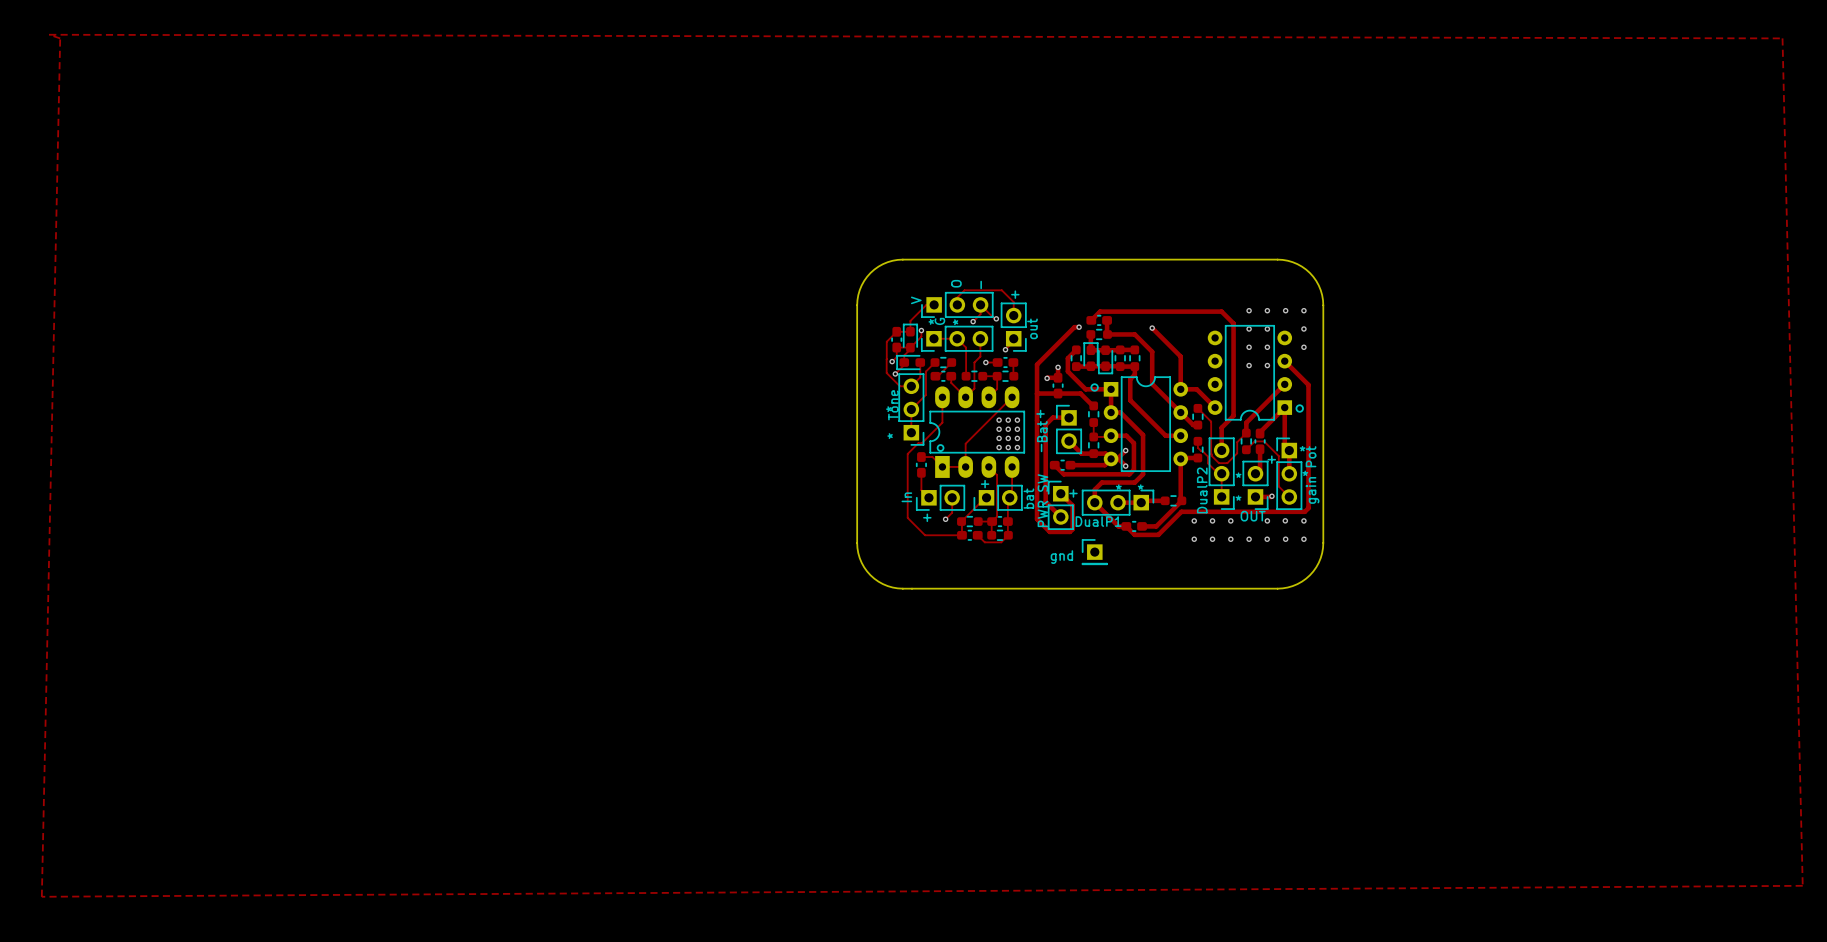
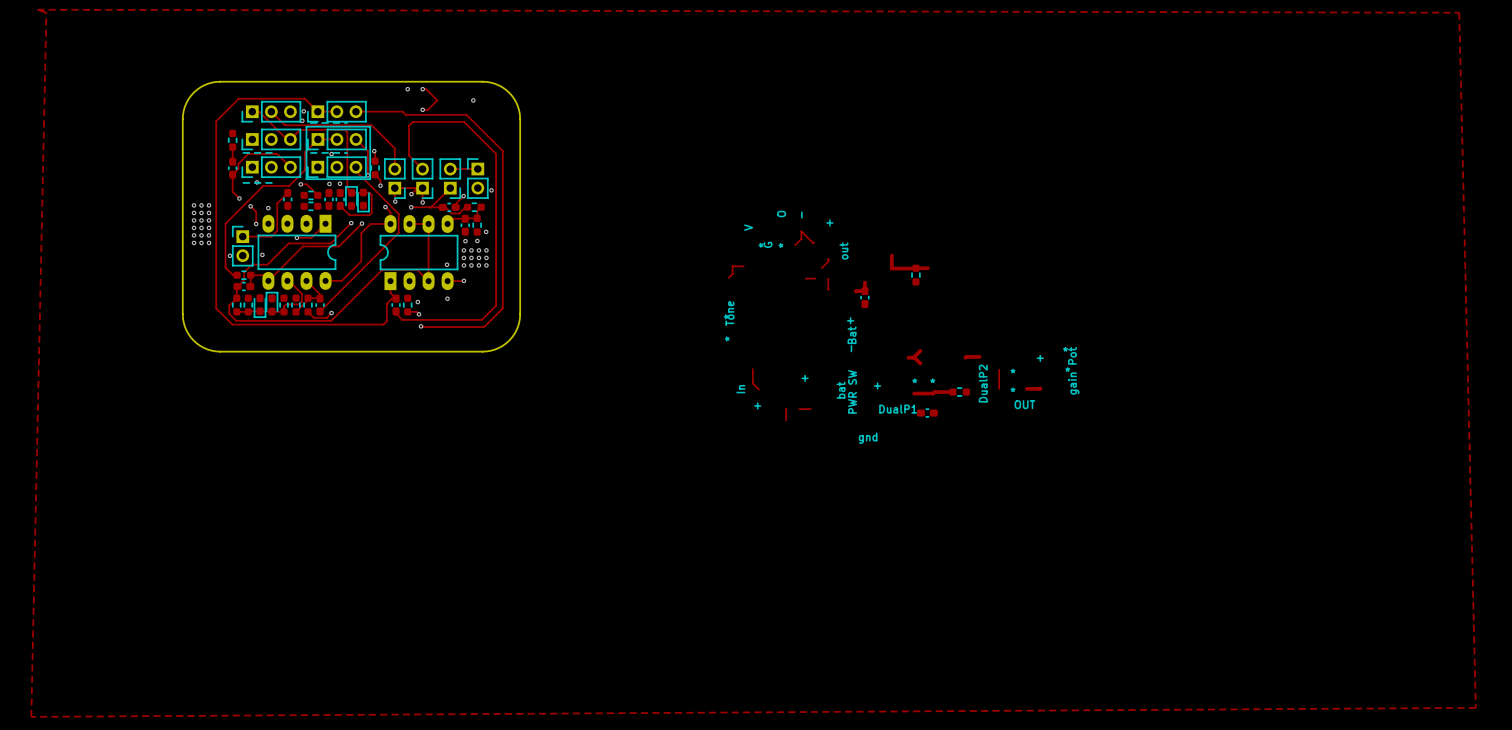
board edge: none -> (220, 81) (482, 81) (495, 83) (506, 89) (516, 102) (520, 119) (520, 314) (518, 326) (512, 337) (498, 347) (482, 351) (220, 351) (207, 349) (196, 343) (188, 334) (183, 318) (183, 115) (186, 102) (193, 92) (204, 85) (220, 81)
via: none -> (407, 89)
track: none -> (422, 89) (426, 89) (437, 100) (428, 109) (422, 109)
via: none -> (422, 89)
via: none -> (473, 100)
via: none -> (422, 109)
via: none -> (303, 111)
track: none -> (252, 111) (259, 111) (286, 139) (290, 139) (300, 129) (345, 129) (347, 132) (347, 188) (351, 192) (369, 192) (371, 194) (371, 212) (369, 215) (349, 215) (340, 205)
track: none -> (271, 111) (284, 125) (371, 125) (394, 148) (394, 169)
part: none -> (271, 111)
track: none -> (336, 111) (317, 111) (304, 98) (238, 98) (216, 121) (216, 308) (232, 324) (383, 324) (386, 321) (386, 303) (392, 298) (396, 298) (390, 292) (390, 281)
part: none -> (336, 111)
track: none -> (355, 111) (402, 111) (405, 114) (466, 114) (492, 140)
via: none -> (302, 120)
line: none -> (310, 122) (347, 122)
line: none -> (306, 126) (370, 126) (370, 179) (306, 179) (306, 126)
part: none -> (271, 139)
track: none -> (337, 139) (317, 139) (304, 152) (304, 170) (289, 185) (263, 185) (225, 223) (225, 267) (233, 275) (237, 275)
part: none -> (337, 139)
track: none -> (356, 139) (367, 151) (367, 175)
part: none -> (232, 140)
track: none -> (492, 140) (502, 151) (502, 308) (484, 327) (421, 326)
track: none -> (232, 147) (232, 161)
track: none -> (374, 151) (375, 161)
via: none -> (374, 151)
line: none -> (242, 152) (276, 152)
line: none -> (310, 152) (347, 152)
via: none -> (331, 154)
part: none -> (271, 167)
part: none -> (336, 167)
track: none -> (355, 167) (355, 171) (398, 213) (398, 232) (319, 311)
part: none -> (232, 168)
part: none -> (375, 167)
track: none -> (450, 169) (477, 169)
track: none -> (422, 169) (408, 155) (408, 125) (412, 121) (464, 121) (496, 153) (496, 305) (481, 319) (402, 319) (396, 311)
track: none -> (290, 172) (290, 167) (277, 153) (248, 153) (238, 163) (238, 168) (232, 174) (232, 191) (239, 198)
track: none -> (375, 174) (380, 180) (380, 185)
via: none -> (367, 175)
part: none -> (394, 178)
part: none -> (422, 178)
part: none -> (450, 178)
part: none -> (477, 178)
line: none -> (242, 182) (276, 182)
via: none -> (257, 182)
via: none -> (340, 183)
track: none -> (300, 184) (306, 184) (317, 195)
via: none -> (300, 184)
via: none -> (329, 183)
via: none -> (380, 185)
track: none -> (417, 188) (411, 194)
track: none -> (450, 188) (431, 207) (411, 207)
via: none -> (491, 190)
track: none -> (287, 192) (277, 203) (277, 230) (271, 236) (242, 236)
via: none -> (411, 194)
board edge: (902, 259) (1277, 259) (1292, 262) (1306, 269) (1318, 285) (1323, 305) (1323, 542) (1320, 558) (1313, 571) (1297, 584) (1277, 588) (902, 588) (887, 586) (874, 578) (864, 567) (857, 548) (857, 300) (861, 285) (870, 272) (883, 264) (902, 259) -> none
part: none -> (310, 195)
track: none -> (463, 196) (455, 204) (455, 207)
via: none -> (463, 196)
via: none -> (239, 198)
part: none -> (351, 198)
part: none -> (287, 199)
part: none -> (328, 199)
part: none -> (340, 199)
part: none -> (363, 200)
track: none -> (395, 201) (394, 188) (422, 188) (422, 202)
via: none -> (395, 201)
via: none -> (422, 202)
via: none -> (194, 205)
via: none -> (201, 205)
via: none -> (209, 205)
track: none -> (250, 206) (256, 211) (256, 224)
via: none -> (250, 206)
part: none -> (310, 206)
track: none -> (385, 207) (390, 212) (390, 223) (370, 223) (361, 233) (361, 261) (341, 280) (325, 280)
via: none -> (385, 207)
via: none -> (411, 207)
part: none -> (449, 207)
track: none -> (467, 207) (459, 213) (451, 213) (445, 207) (429, 207)
part: none -> (474, 207)
track: none -> (481, 207) (477, 211) (477, 218) (452, 218) (447, 223)
via: none -> (268, 208)
via: none -> (194, 212)
via: none -> (201, 212)
via: none -> (209, 212)
via: none -> (194, 220)
via: none -> (201, 220)
via: none -> (209, 220)
track: none -> (351, 223) (330, 243) (288, 243) (267, 264) (251, 264) (244, 272) (244, 279) (236, 287) (236, 298) (229, 305) (229, 313) (236, 320) (331, 320) (382, 269) (417, 269) (428, 281) (428, 223) (409, 223)
via: none -> (351, 223)
via: none -> (256, 224)
track: none -> (325, 223) (311, 237) (296, 237)
track: none -> (361, 223) (339, 246) (302, 246) (268, 280) (262, 275) (250, 275) (250, 286)
via: none -> (361, 223)
part: none -> (465, 225)
part: none -> (477, 225)
via: none -> (194, 227)
via: none -> (201, 227)
via: none -> (209, 227)
track: (934, 304) (926, 304) (910, 320) (910, 331) -> none
track: (957, 304) (957, 297) (964, 290) (1001, 290) (1013, 302) (1013, 315) -> none
part: (957, 304) -> none
via: none -> (486, 231)
via: none -> (194, 235)
via: none -> (201, 235)
via: none -> (209, 235)
via: (1249, 310) -> none
via: (1267, 310) -> none
via: (1285, 310) -> none
via: (1303, 310) -> none
via: none -> (296, 237)
via: none -> (465, 241)
via: none -> (477, 240)
via: (996, 318) -> none
via: none -> (194, 242)
via: none -> (201, 242)
via: none -> (209, 242)
track: (1091, 320) (1100, 311) (1221, 311) (1233, 323) (1233, 415) (1221, 427) (1221, 450) -> none
part: (1099, 320) -> none
track: (1107, 320) (1107, 334) (1134, 334) (1152, 351) (1152, 384) (1193, 425) (1197, 425) -> none
via: (973, 321) -> none
part: none -> (242, 246)
part: (1013, 327) -> none
track: (1079, 327) (1074, 327) (1037, 364) (1037, 519) (1049, 531) (1069, 531) (1072, 529) (1072, 505) (1060, 493) -> none
via: (1079, 327) -> none
via: none -> (463, 250)
via: none -> (471, 250)
via: none -> (478, 250)
via: none -> (486, 250)
track: (1152, 328) (1180, 356) (1180, 389) (1196, 389) (1215, 407) -> none
via: (1152, 328) -> none
via: (1249, 328) -> none
via: (1267, 328) -> none
via: (1303, 328) -> none
part: none -> (296, 252)
part: none -> (419, 252)
track: (921, 330) (921, 336) (904, 355) (904, 365) (895, 373) -> none
via: (921, 330) -> none
track: (910, 331) (896, 331) (886, 341) (886, 359) -> none
via: none -> (262, 254)
via: none -> (230, 255)
part: (1099, 334) -> none
via: none -> (463, 257)
via: none -> (471, 257)
via: none -> (478, 257)
via: none -> (486, 257)
part: (910, 338) -> none
track: (933, 338) (957, 338) (966, 347) (966, 376) -> none
part: (957, 338) -> none
track: (980, 338) (980, 356) (974, 362) (974, 388) (965, 397) (951, 382) (951, 376) -> none
part: (896, 339) -> none
via: none -> (447, 264)
via: none -> (463, 265)
via: none -> (471, 265)
via: none -> (478, 265)
via: none -> (486, 265)
via: (1249, 347) -> none
via: (1267, 347) -> none
via: (1303, 347) -> none
via: (1005, 349) -> none
track: (1076, 349) (1067, 358) (1067, 371) (1085, 389) (1111, 389) (1111, 412) (1120, 412) (1143, 435) (1143, 474) (1134, 482) (1101, 482) (1094, 489) (1094, 502) (1118, 526) (1126, 526) (1134, 534) (1158, 534) (1181, 511) (1304, 511) (1308, 508) (1308, 384) (1284, 361) -> none
part: (1090, 356) -> none
part: none -> (243, 275)
part: (1076, 358) -> none
part: (1134, 358) -> none
track: (886, 359) (886, 373) (899, 386) (911, 386) (920, 377) (920, 362) -> none
part: (1105, 359) -> none
via: (892, 361) -> none
part: (910, 362) -> none
track: (935, 362) (925, 371) (925, 394) (911, 409) (911, 432) -> none
part: (943, 362) -> none
track: (951, 362) (937, 376) (935, 376) -> none
via: (985, 362) -> none
part: (1005, 362) -> none
track: none -> (287, 280) (301, 293) (301, 301) (299, 304) (286, 304) (284, 311) (236, 311)
track: none -> (306, 280) (319, 294) (319, 298) (307, 298) (295, 311)
track: none -> (463, 280) (447, 281)
via: none -> (463, 280)
via: (1249, 365) -> none
via: (1267, 365) -> none
track: (1076, 366) (1134, 366) (1134, 374) (1130, 379) (1130, 400) (1165, 435) (1180, 435) -> none
via: (1058, 367) -> none
part: none -> (243, 286)
part: (1249, 372) -> none
via: (895, 373) -> none
part: (943, 376) -> none
part: (974, 376) -> none
track: (982, 376) (997, 376) (997, 389) (988, 397) -> none
part: (1005, 376) -> none
via: (1047, 378) -> none
drawing: [1090, 383, 1099, 392] -> none
track: (1284, 384) (1246, 422) (1246, 433) (1237, 442) (1237, 453) (1227, 463) (1218, 463) (1211, 455) (1211, 421) (1197, 408) -> none
via: none -> (447, 298)
via: none -> (417, 302)
part: none -> (272, 303)
track: (1037, 393) (1080, 393) (1093, 405) -> none
part: none -> (236, 305)
part: none -> (248, 305)
part: none -> (284, 305)
part: none -> (295, 305)
part: none -> (307, 305)
part: none -> (319, 305)
part: none -> (396, 305)
part: none -> (407, 305)
part: none -> (260, 305)
track: (942, 397) (942, 422) (921, 443) (918, 443) (907, 453) (907, 517) (925, 535) (961, 534) -> none
track: (1012, 397) (965, 443) (965, 466) (942, 466) (932, 457) (921, 457) -> none
track: none -> (308, 311) (313, 317) (326, 317) (331, 313)
track: none -> (407, 311) (416, 311) (419, 314)
via: none -> (331, 313)
drawing: [1295, 404, 1304, 413] -> none
via: none -> (419, 314)
part: (911, 409) -> none
part: (1093, 414) -> none
part: (1197, 416) -> none
track: (1061, 417) (1052, 417) (1045, 424) (1045, 501) (1060, 516) -> none
via: none -> (421, 326)
via: (999, 420) -> none
via: (1008, 420) -> none
via: (1017, 420) -> none
track: (1093, 422) (1093, 436) (1126, 435) (1133, 443) (1133, 469) (1129, 474) (1063, 474) (1054, 465) -> none
part: (1145, 424) -> none
via: (999, 429) -> none
via: (1008, 429) -> none
via: (1017, 429) -> none
part: (1069, 429) -> none
part: (977, 432) -> none
track: (1260, 433) (1284, 407) (1284, 445) (1289, 450) (1289, 473) -> none
via: (999, 438) -> none
via: (1008, 438) -> none
via: (1017, 438) -> none
track: (1069, 441) (1081, 453) (1105, 453) (1111, 458) (1104, 465) (1070, 465) -> none
track: (1197, 441) (1197, 447) (1207, 456) (1207, 463) (1218, 473) (1221, 473) (1221, 468) -> none
part: (1246, 441) -> none
part: (1260, 441) -> none
drawing: [937, 444, 945, 452] -> none
part: (1093, 445) -> none
via: (999, 447) -> none
via: (1008, 447) -> none
via: (1017, 447) -> none
part: (1197, 449) -> none
track: (1246, 449) (1254, 441) (1264, 441) (1278, 456) (1278, 486) (1289, 496) -> none
track: (1260, 449) (1260, 469) (1255, 473) -> none
via: (1125, 450) -> none
track: (1181, 460) (1180, 458) (1181, 500) (1156, 526) (1142, 526) -> none
part: (921, 464) -> none
part: (1062, 465) -> none
track: (988, 466) (997, 475) (997, 516) (991, 522) (991, 535) -> none
track: (1012, 466) (1012, 495) (1007, 499) (1008, 535) (1001, 542) (984, 542) (977, 535) -> none
via: (1125, 466) -> none
part: (1221, 473) -> none
part: (1289, 473) -> none
part: (1255, 485) -> none
via: (1271, 496) -> none
part: (940, 497) -> none
track: (952, 497) (952, 512) (945, 519) -> none
track: (985, 497) (961, 521) (961, 518) -> none
part: (998, 497) -> none
part: (1118, 502) -> none
part: (1060, 505) -> none
via: (945, 519) -> none
via: (1194, 520) -> none
via: (1212, 520) -> none
via: (1230, 520) -> none
via: (1267, 520) -> none
via: (1285, 520) -> none
via: (1303, 520) -> none
part: (969, 521) -> none
part: (1000, 521) -> none
part: (969, 535) -> none
part: (1000, 535) -> none
via: (1194, 539) -> none
via: (1212, 539) -> none
via: (1230, 539) -> none
via: (1249, 539) -> none
via: (1267, 539) -> none
via: (1285, 539) -> none
via: (1303, 539) -> none
part: (1094, 552) -> none

